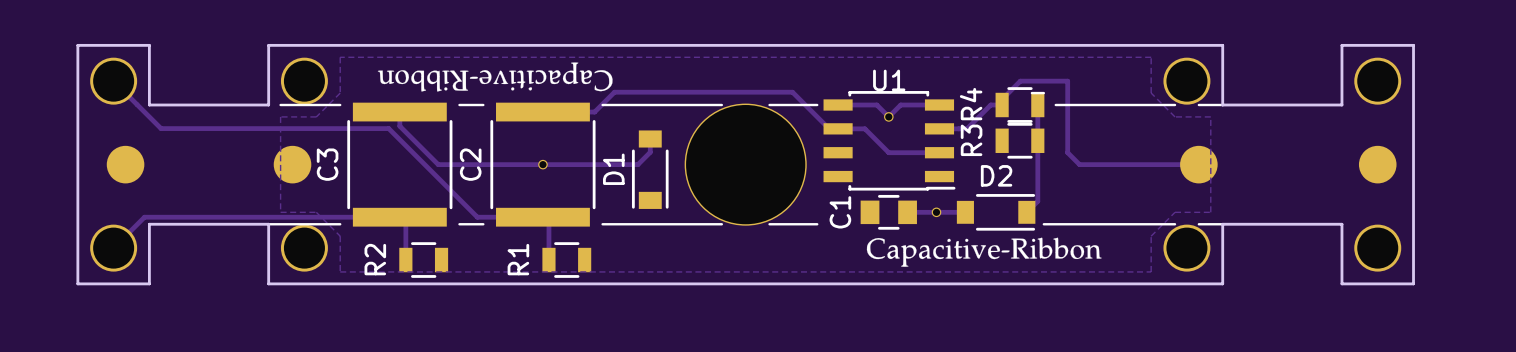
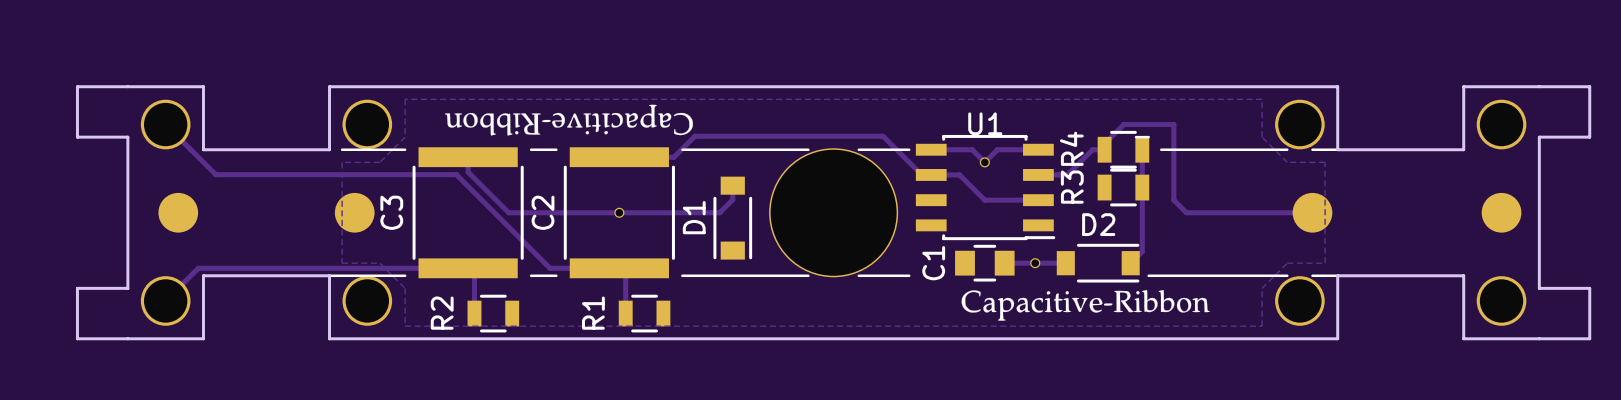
board edge: (77, 45) (77, 93) -> (127, 86) (77, 86) (77, 137) (127, 137)
board edge: (1413, 45) (1413, 93) -> (1539, 86) (1589, 86) (1589, 137) (1539, 137)
board edge: (77, 236) (77, 283) -> (127, 288) (77, 288) (77, 338) (127, 338)
board edge: (1413, 236) (1413, 283) -> (1539, 288) (1589, 288) (1589, 338) (1539, 338)

